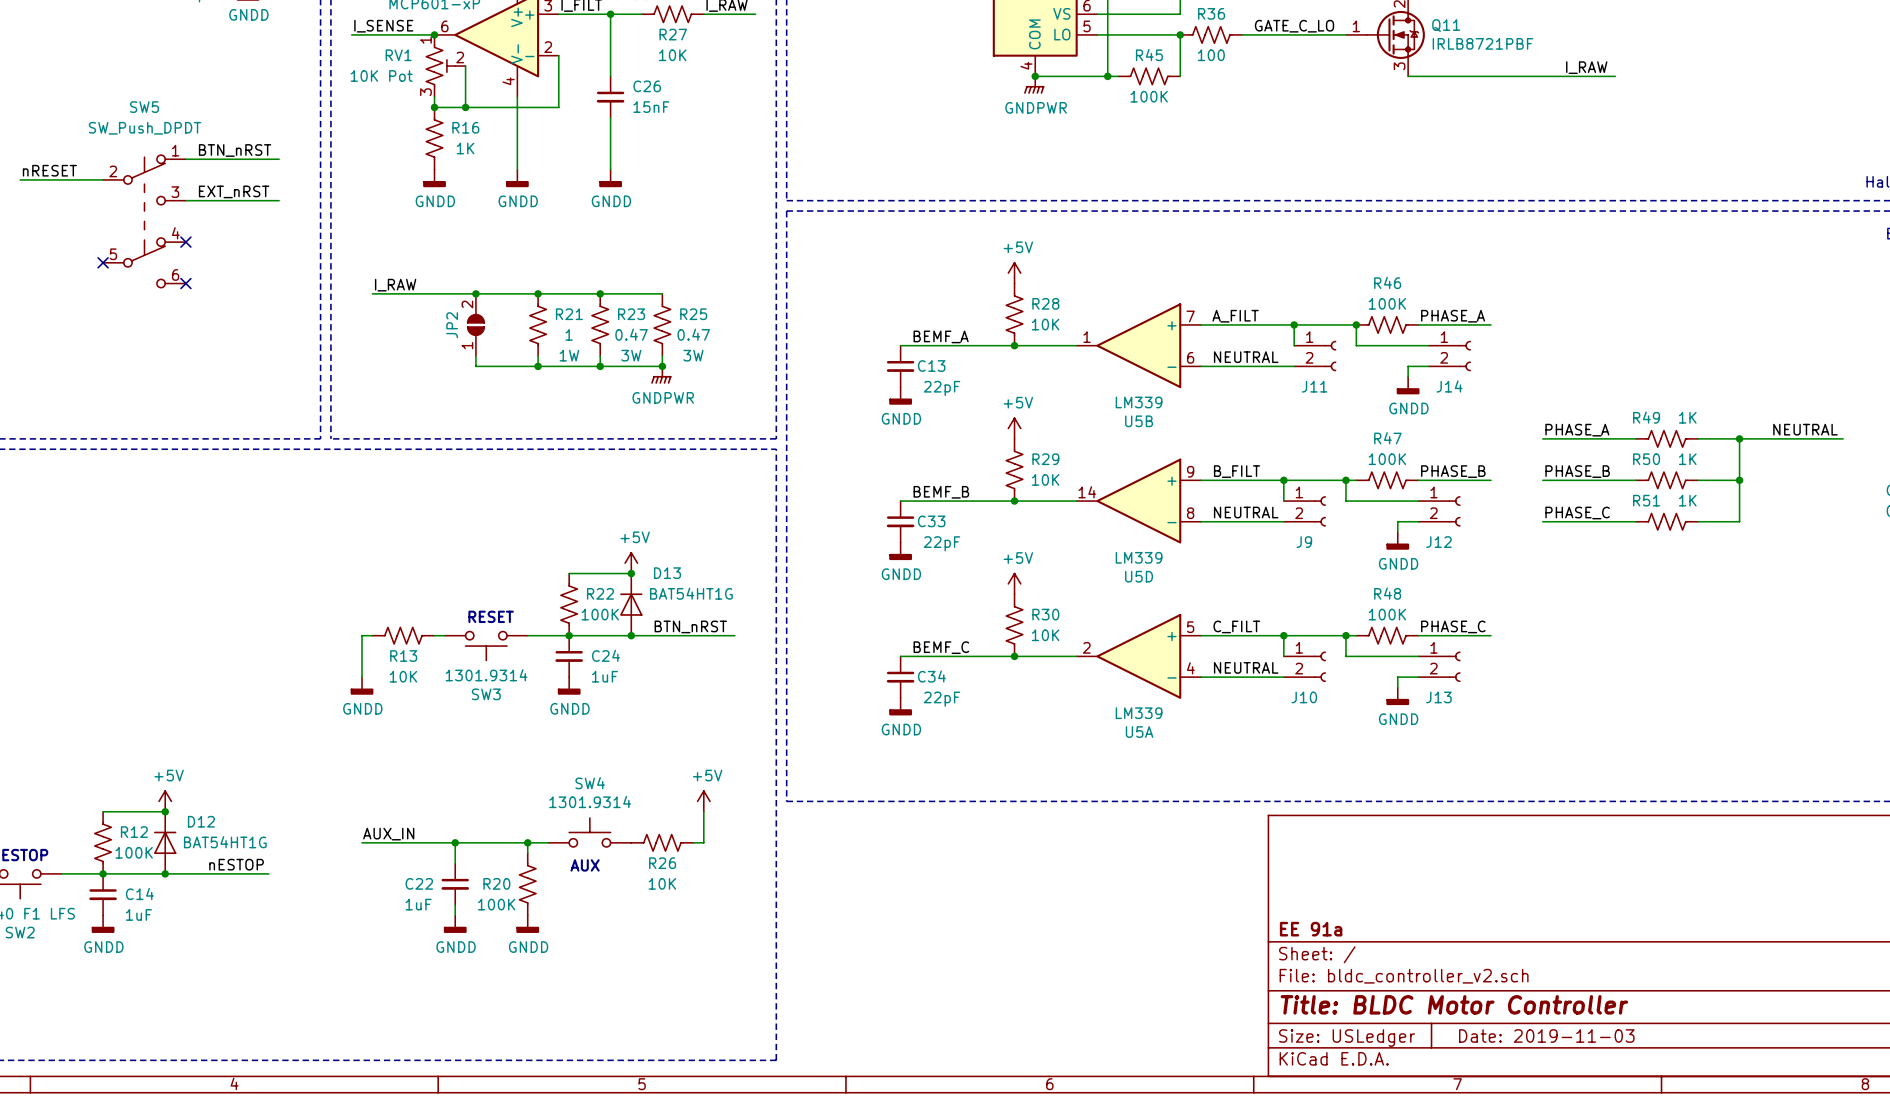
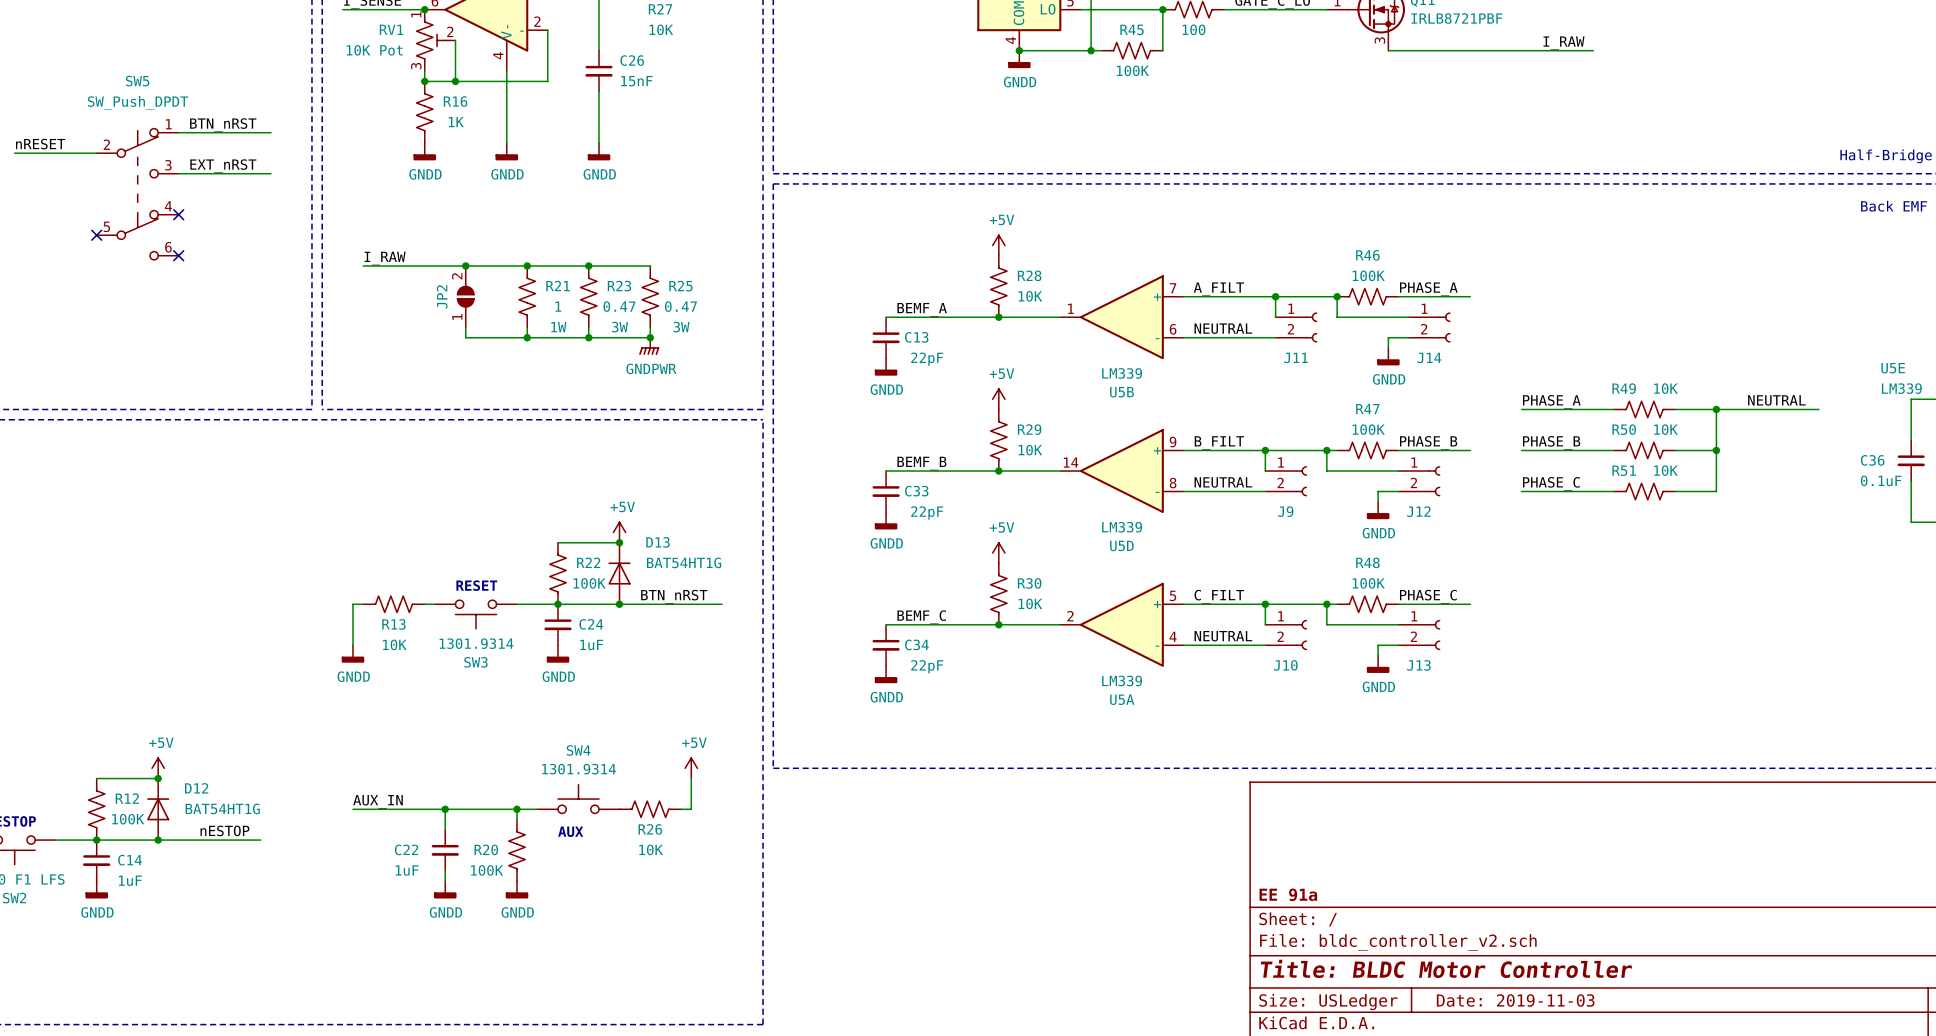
power symbol: GNDPWR (1034, 85) -> GNDD (1019, 59)
R49 value: 1K (1687, 417) -> 10K (1665, 388)
R50 value: 1K (1687, 459) -> 10K (1665, 429)
R51 value: 1K (1687, 500) -> 10K (1665, 470)

